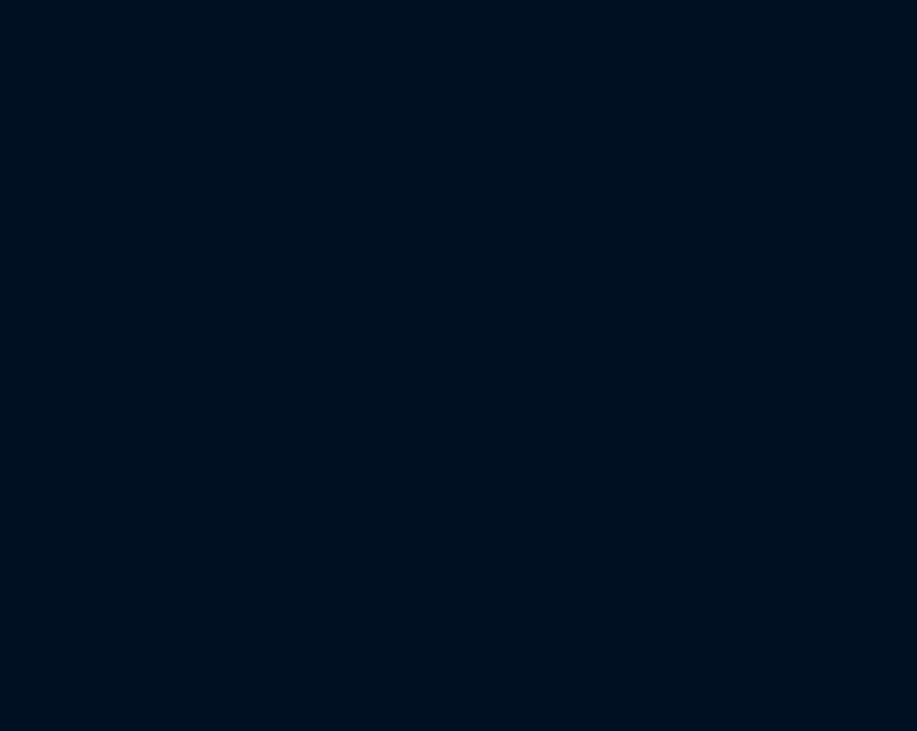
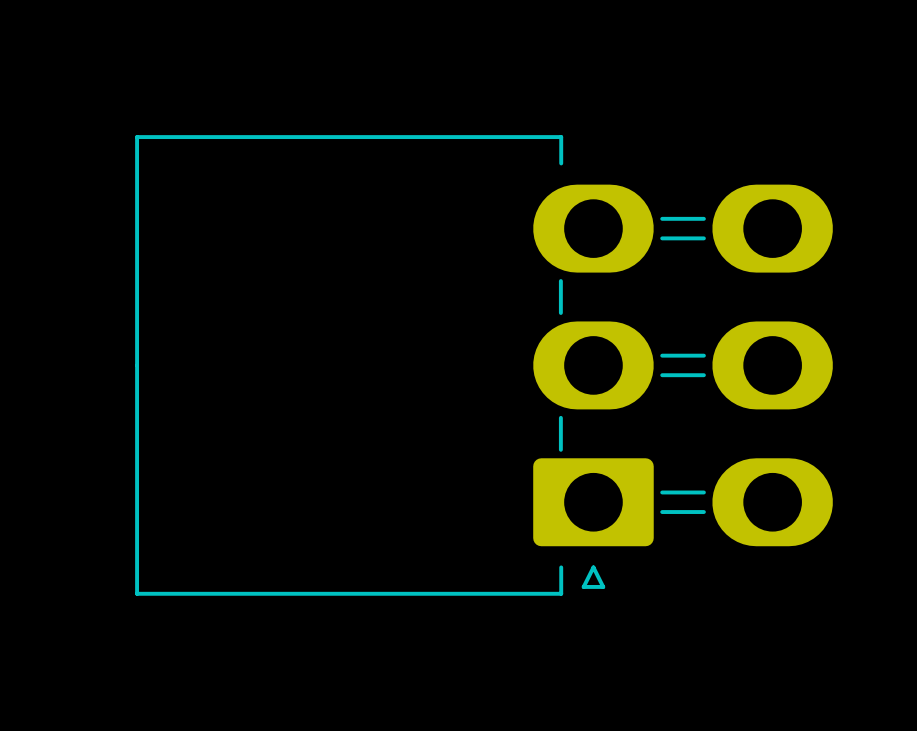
part: none -> (484, 365)

